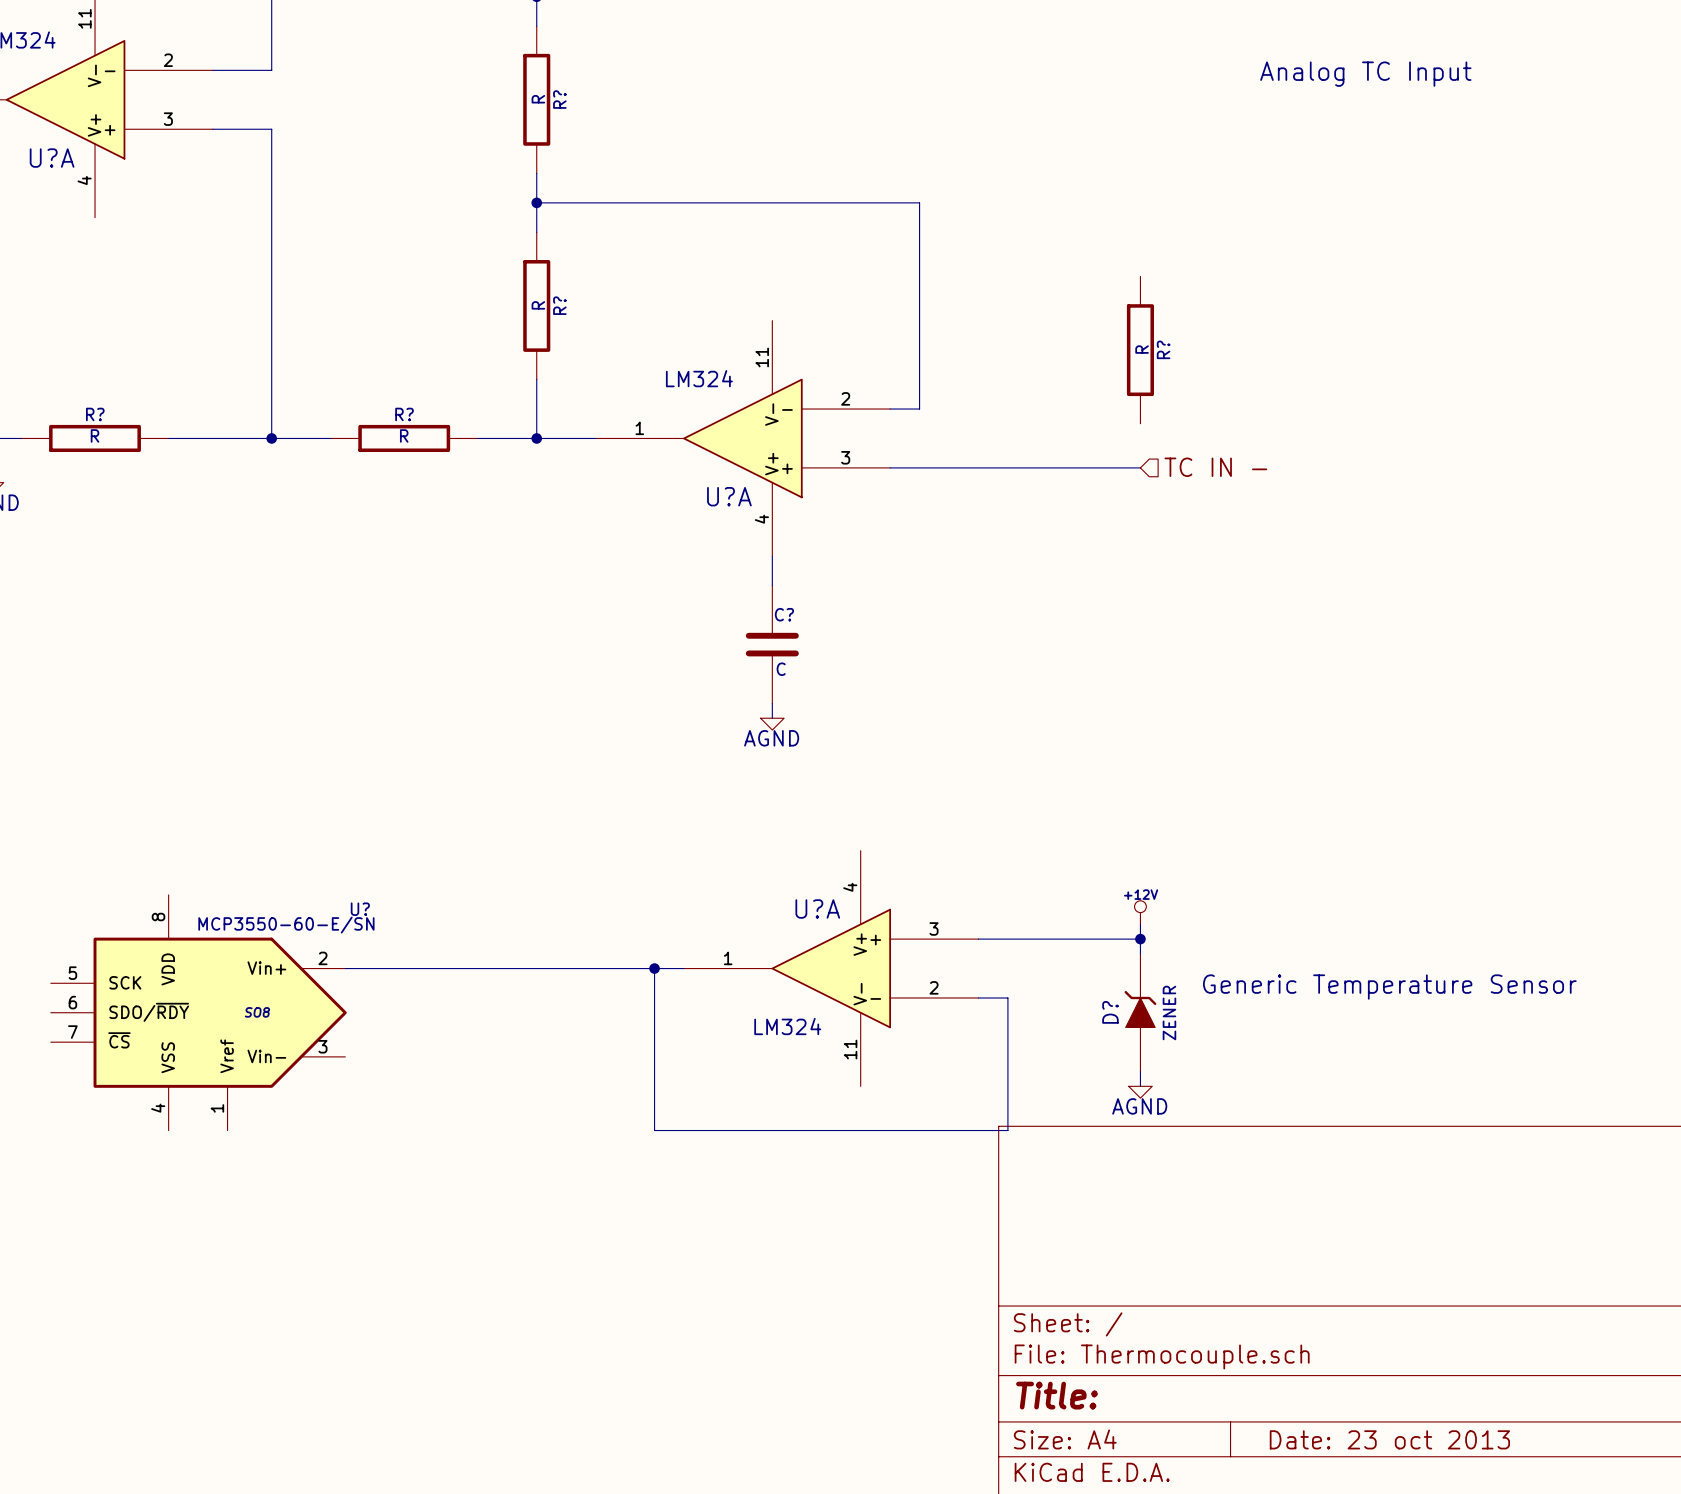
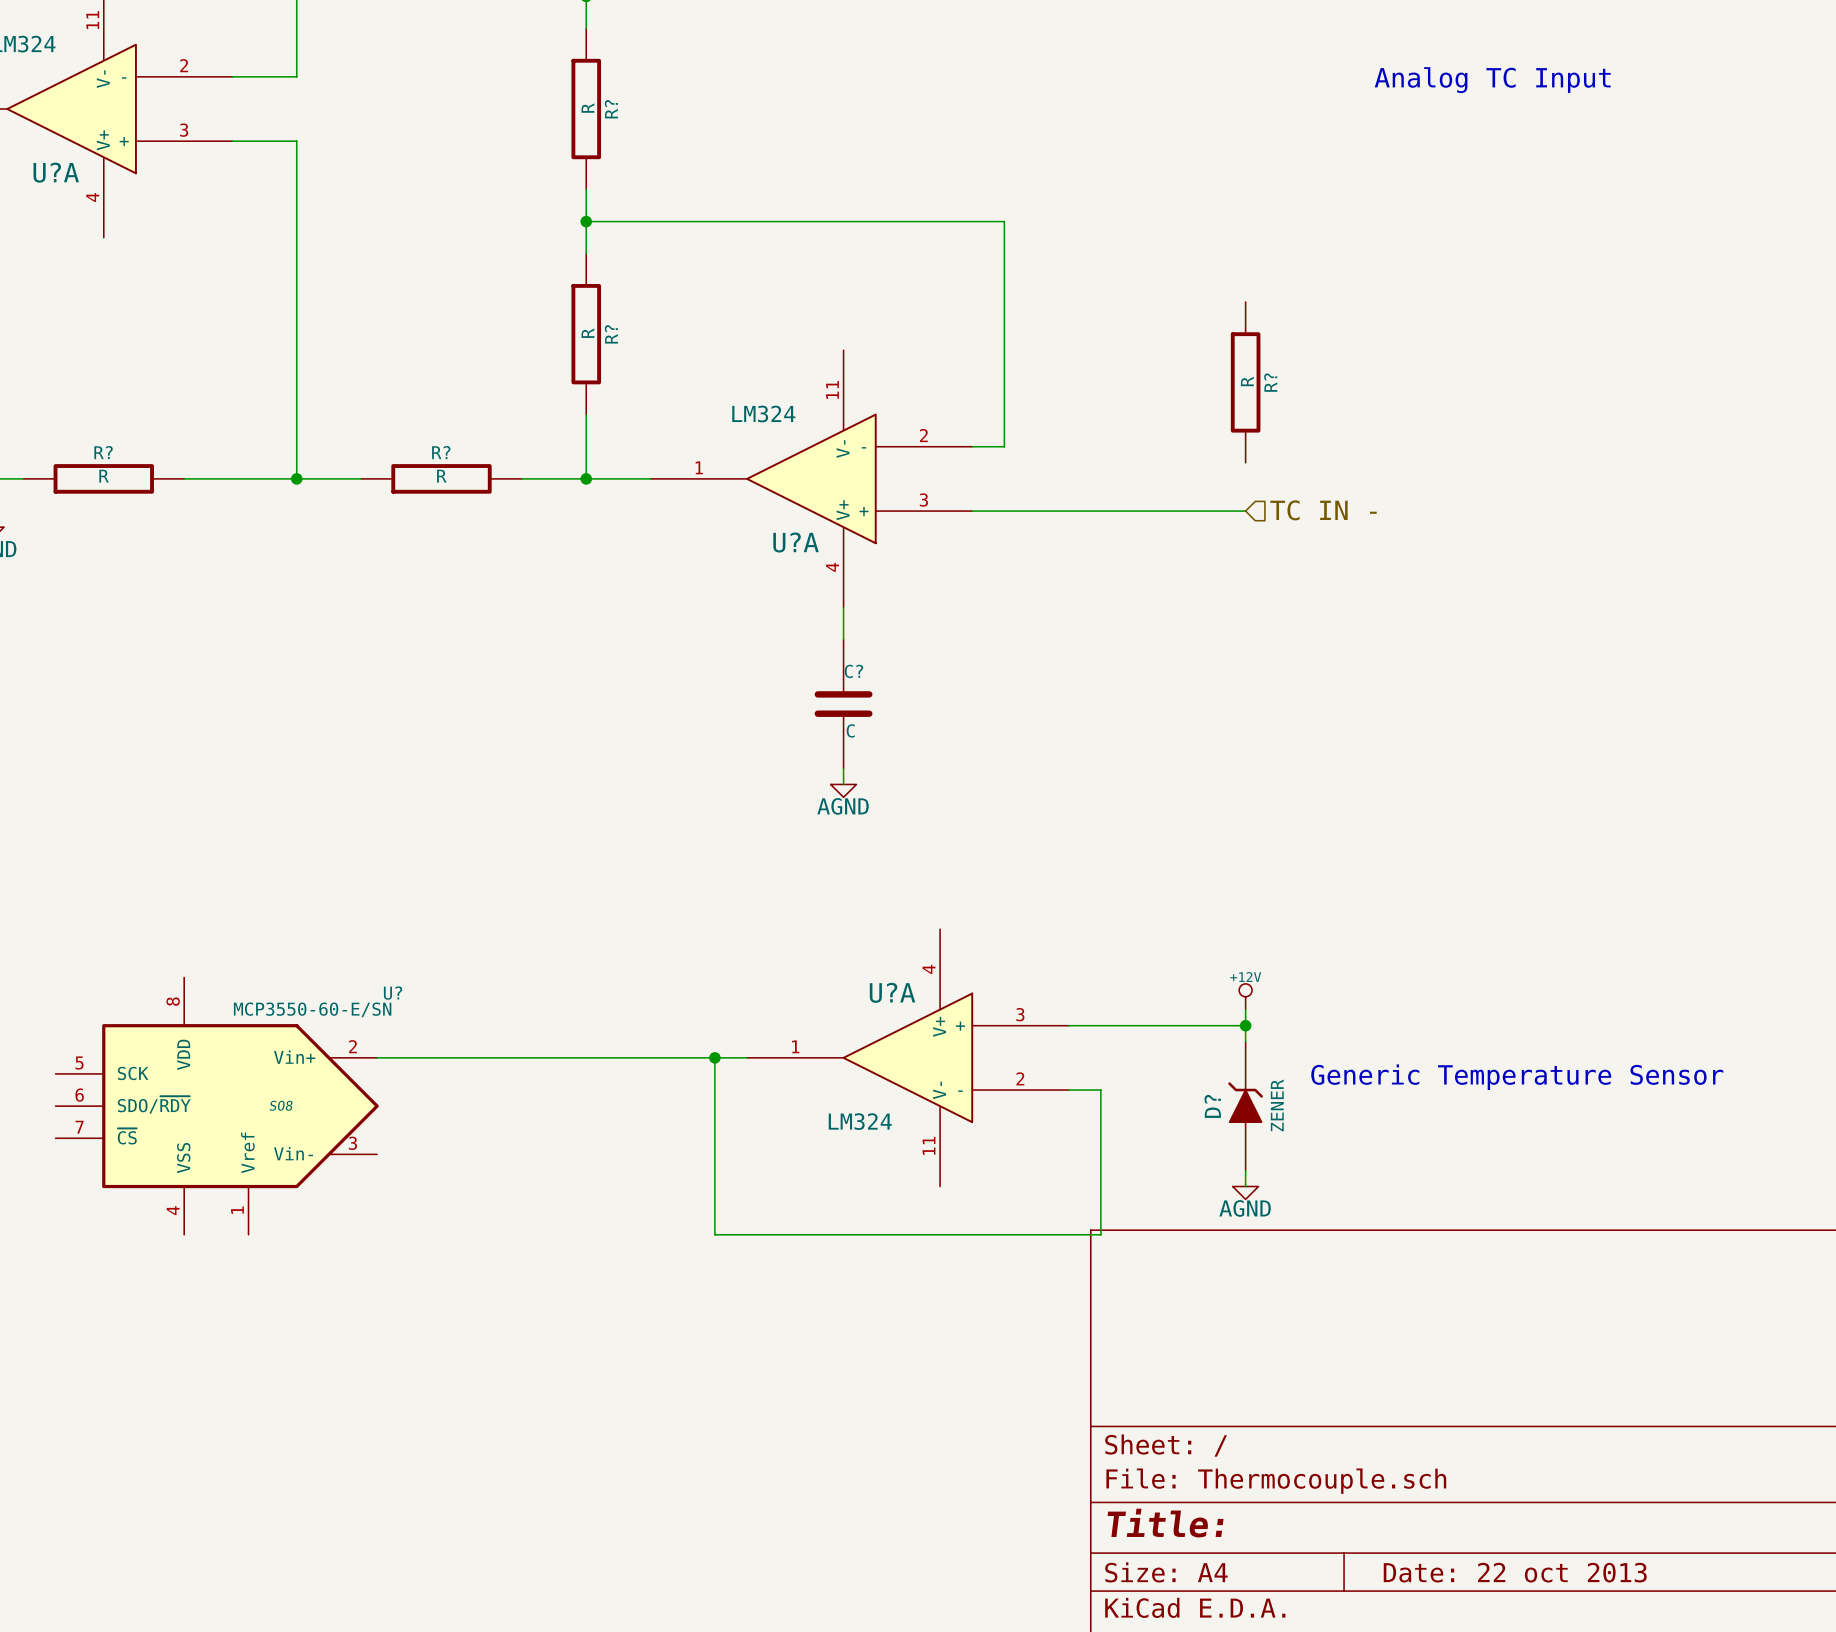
title block: Date: 23 oct 2013 (1389, 1439) -> Date: 22 oct 2013 (1515, 1572)

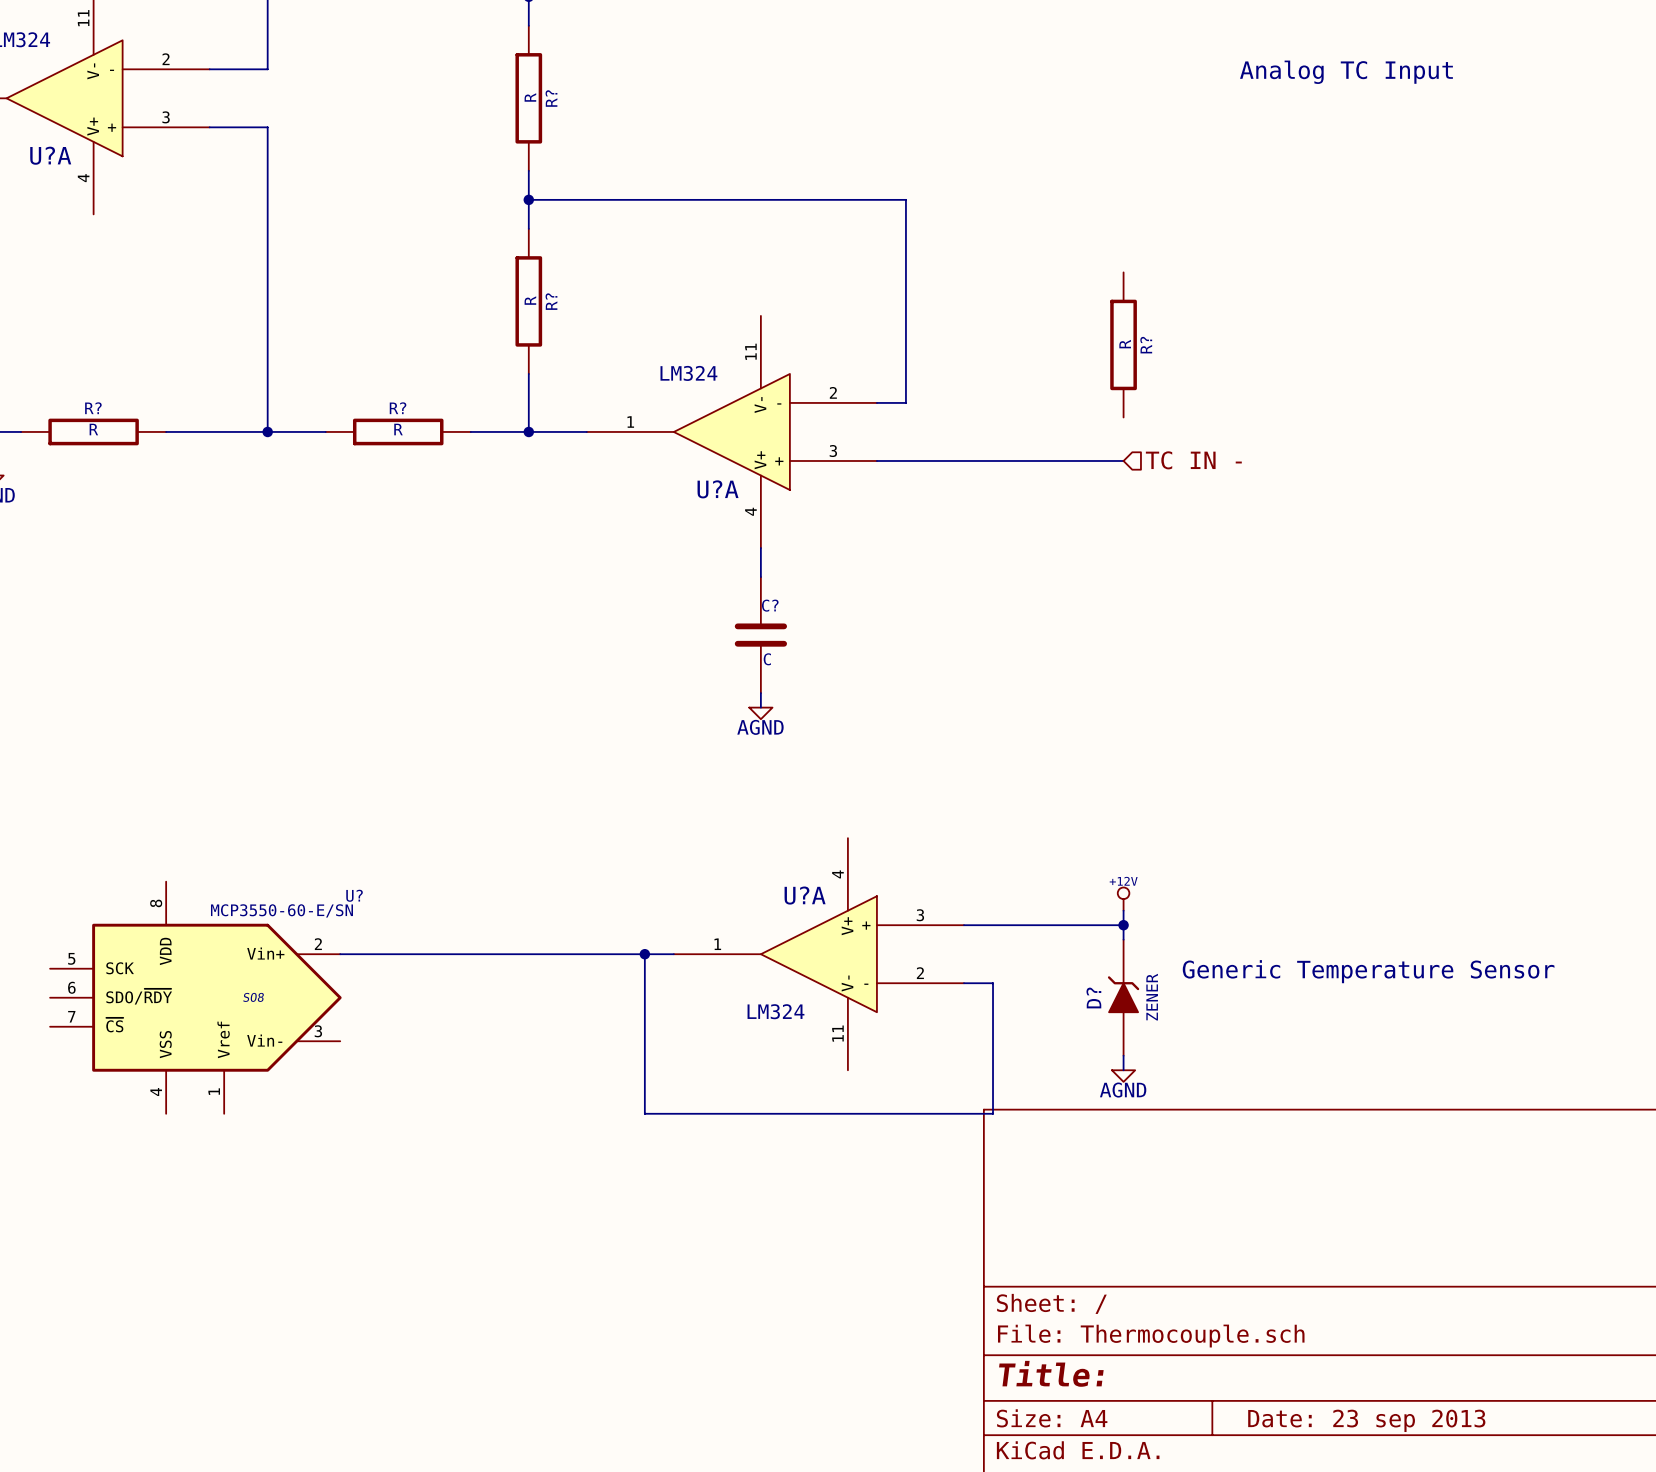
title block: Date: 22 oct 2013 (1515, 1572) -> Date: 23 sep 2013 (1366, 1420)

